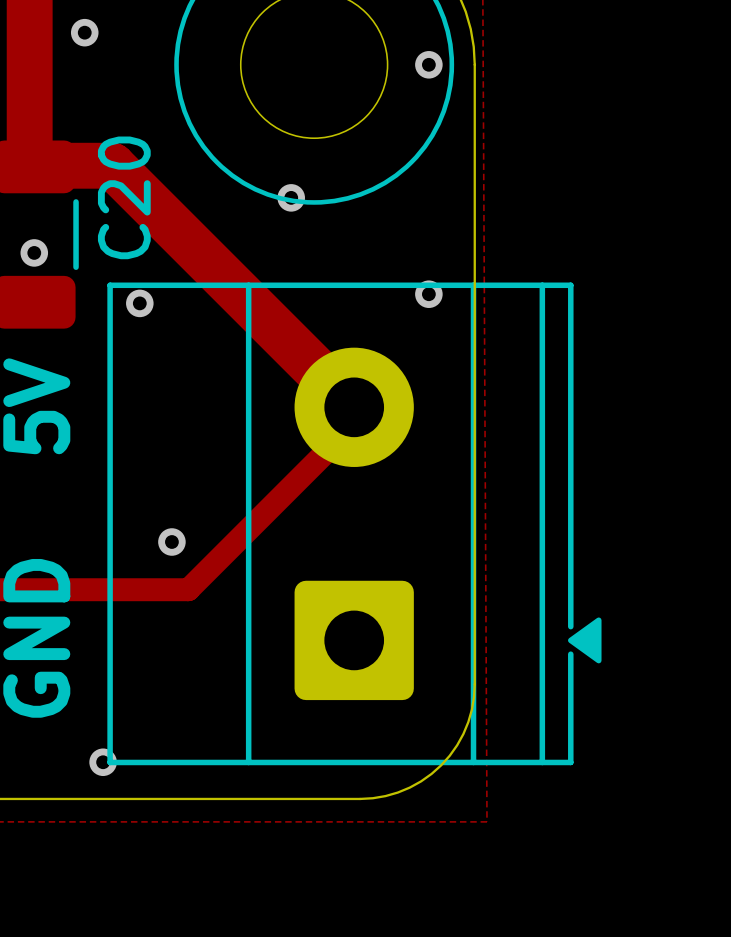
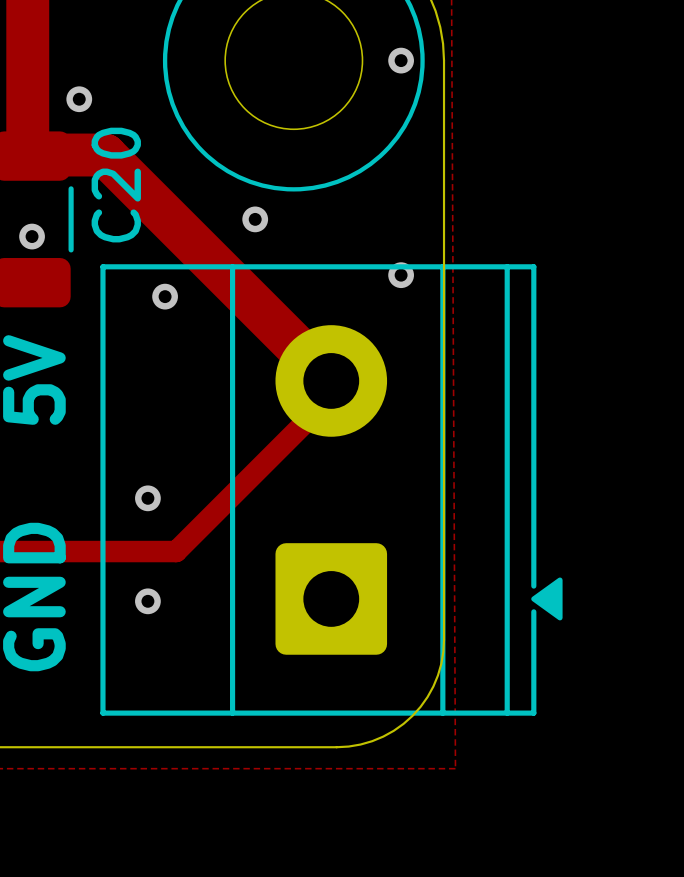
via: (84, 32) -> none
via: none -> (79, 99)
via position: (291, 197) -> (255, 219)
via position: (139, 303) -> (165, 296)
via position: (171, 542) -> (147, 498)
via: none -> (147, 601)
via: (103, 762) -> none

